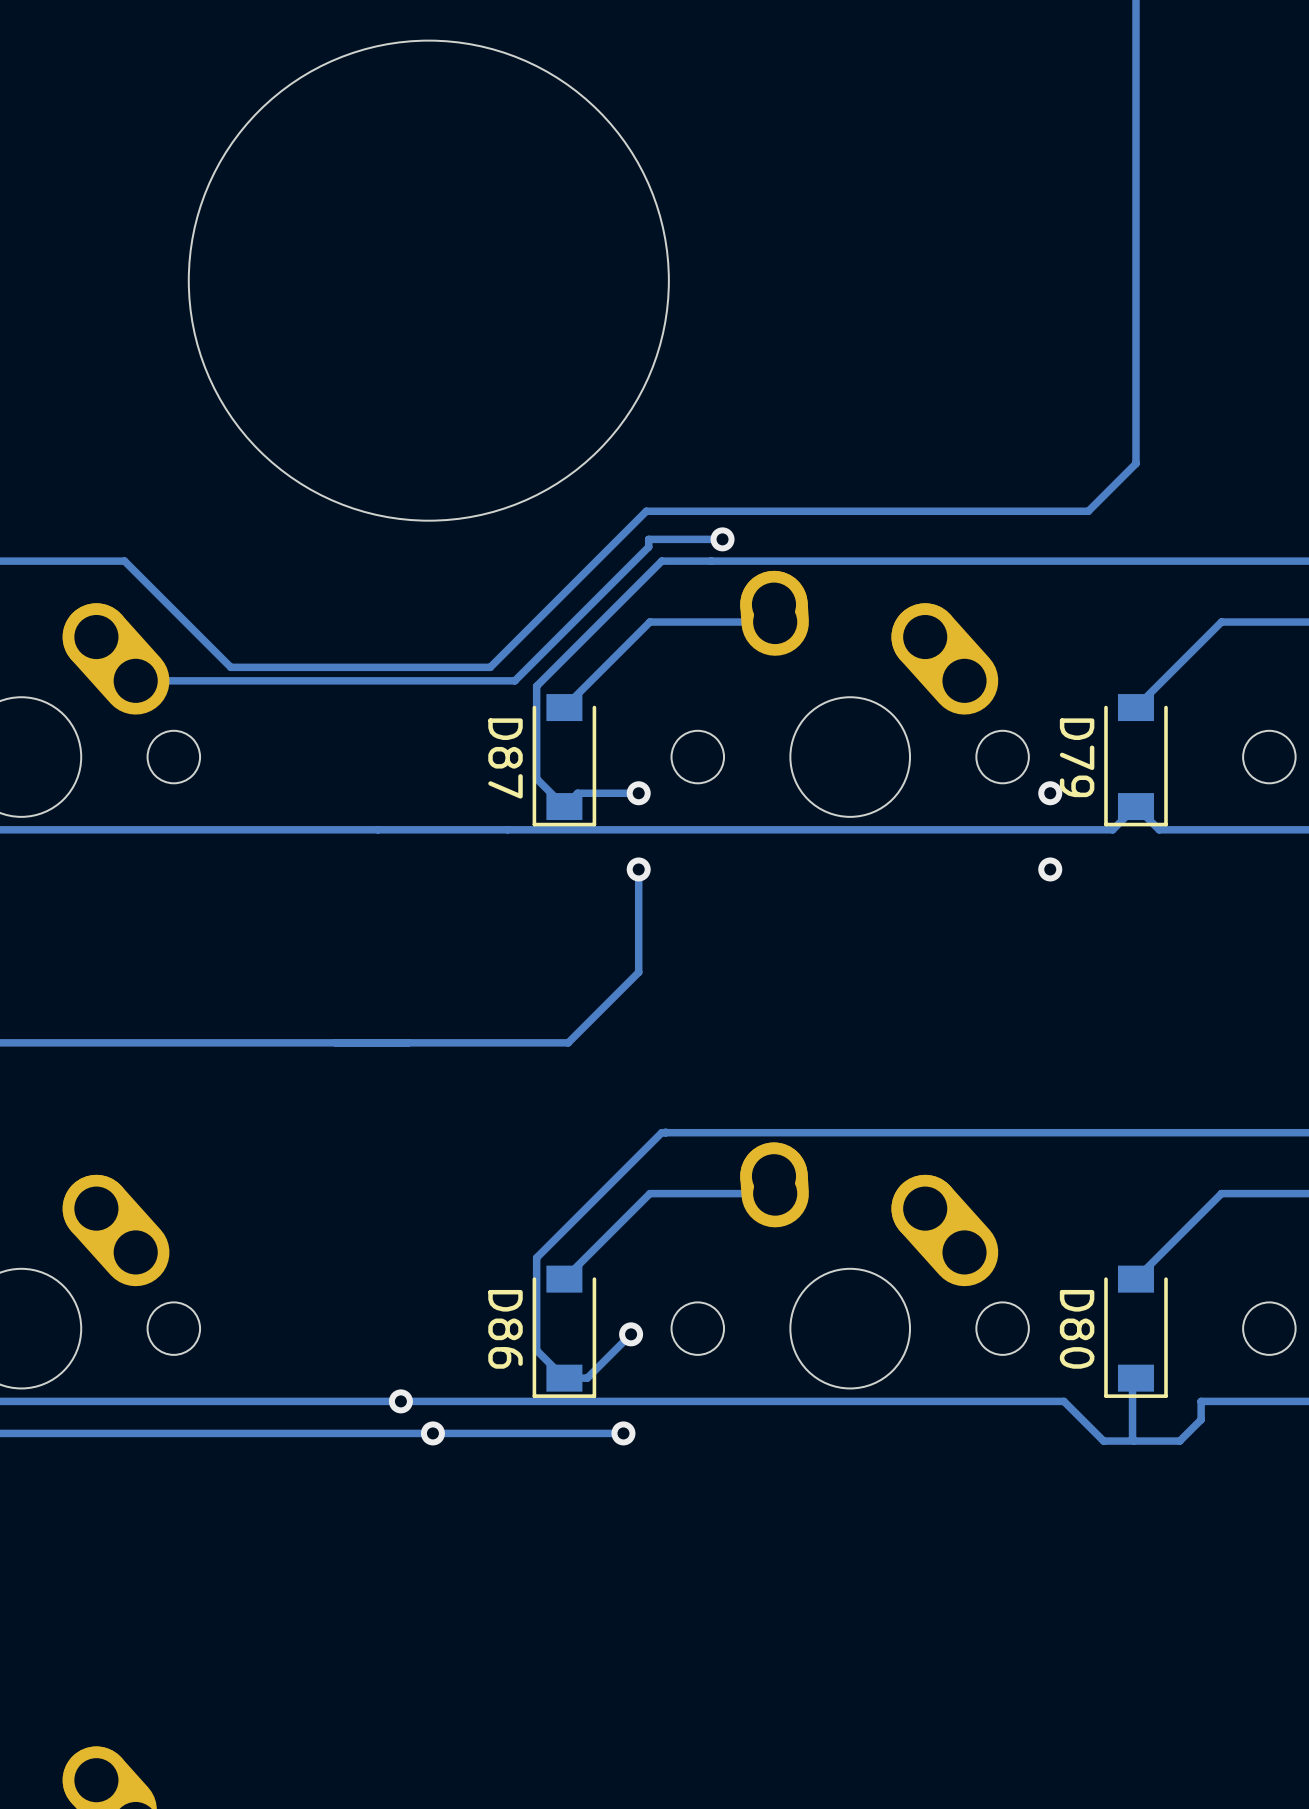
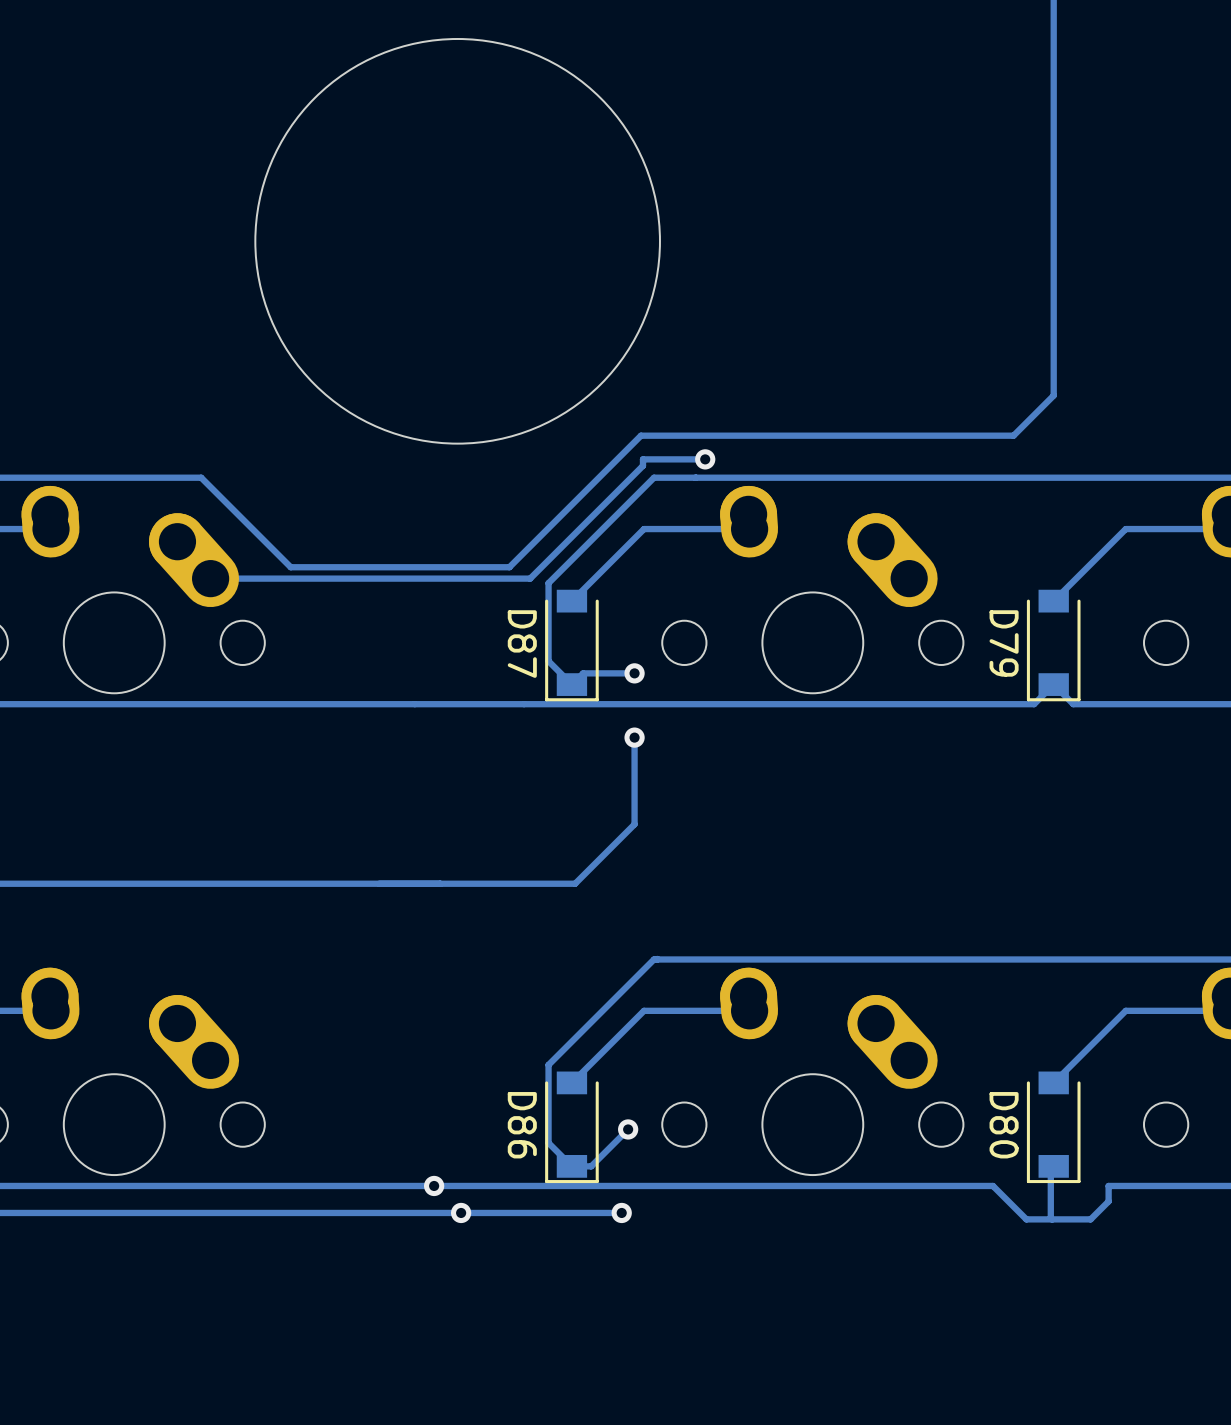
via: (1050, 793) -> none
via: (1050, 869) -> none

